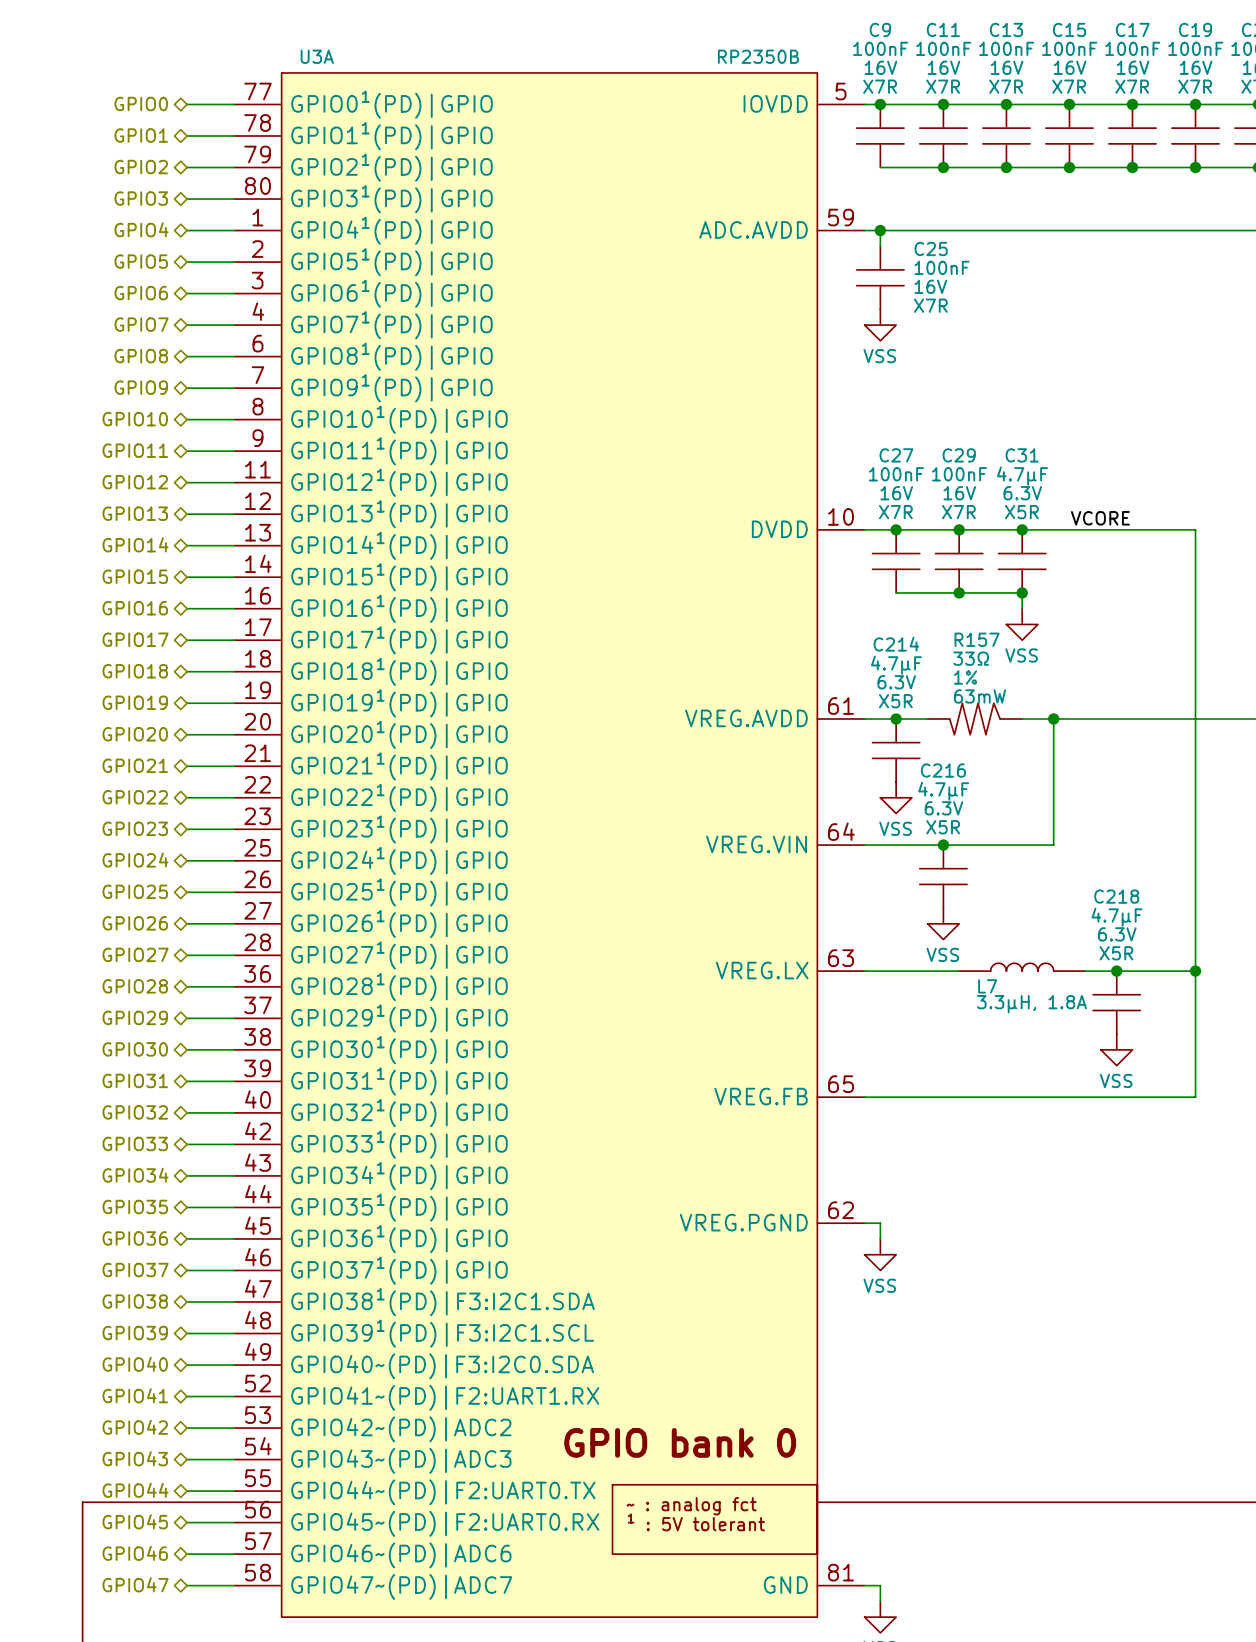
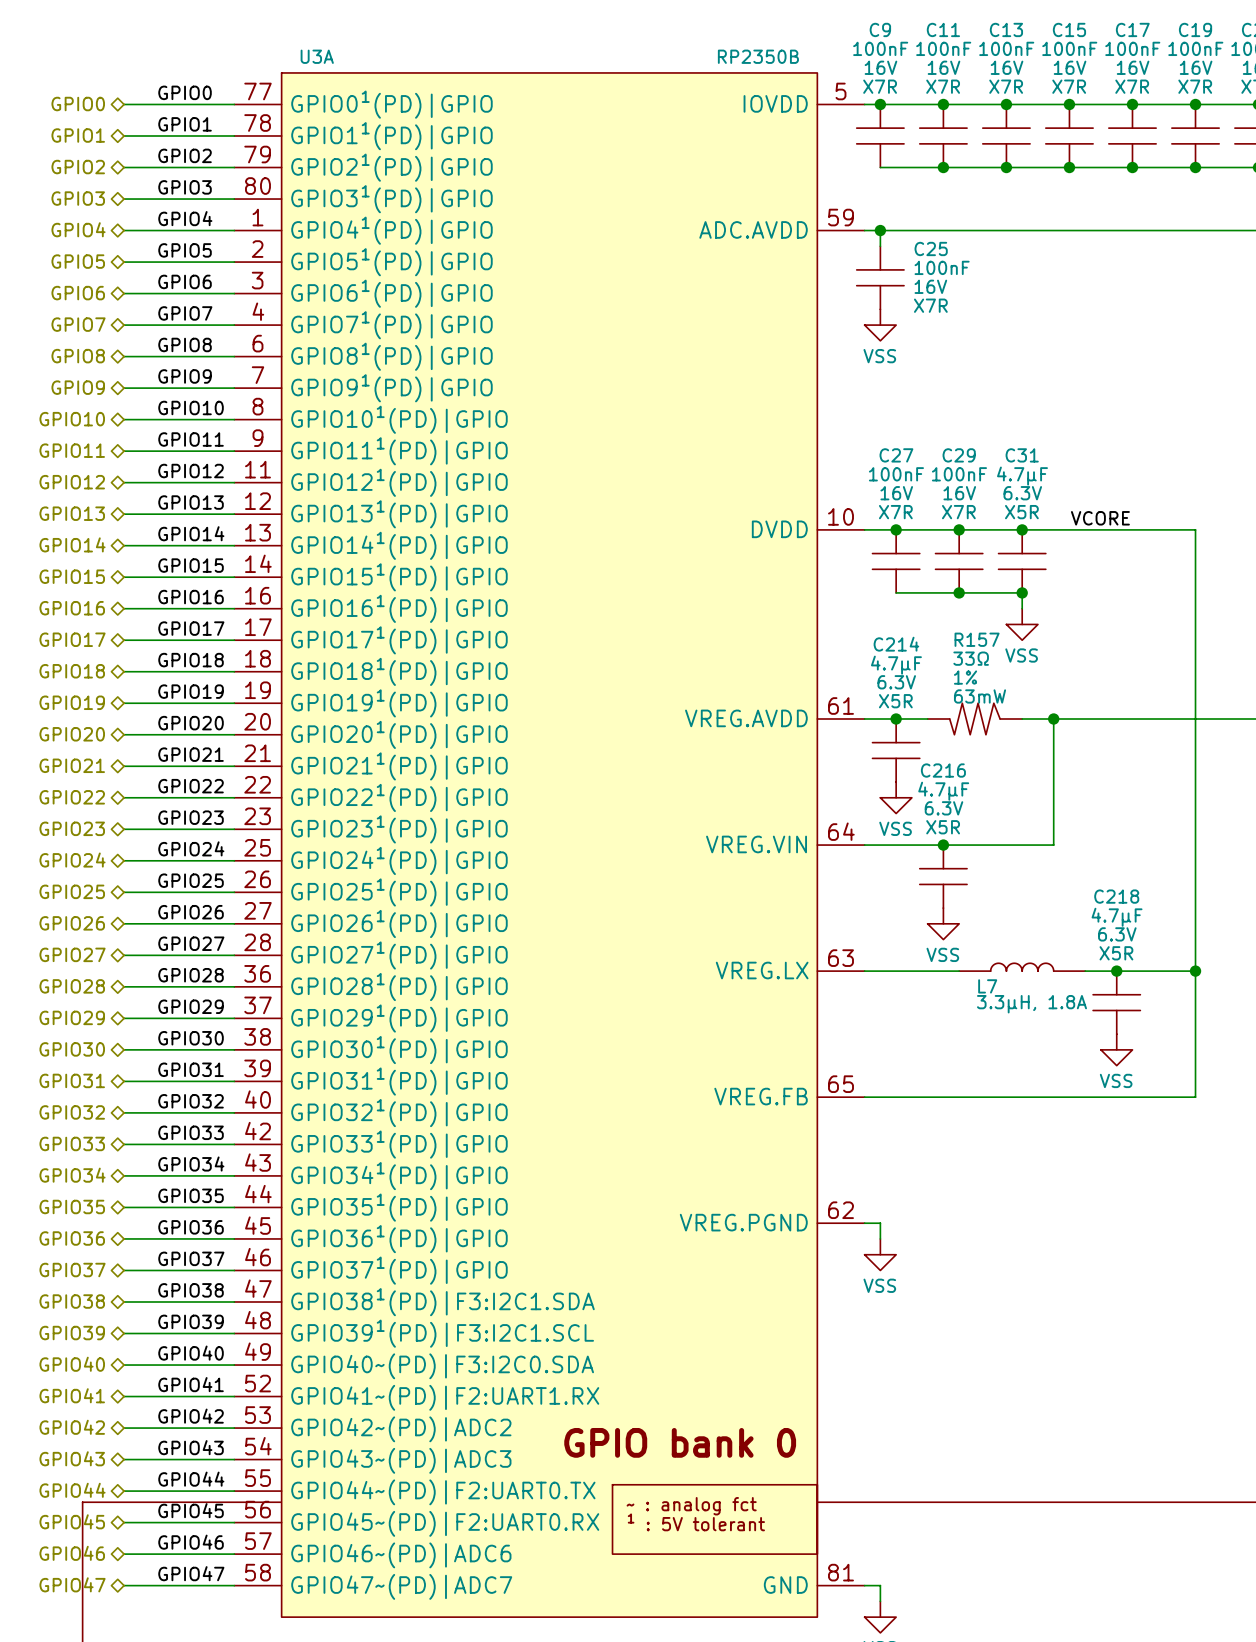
label: none -> GPIO0 (185, 92)
wire: none -> (124, 104) (187, 104)
hierarchical label position: GPIO0 (141, 104) -> GPIO0 (78, 104)
label: none -> GPIO1 (185, 124)
hierarchical label position: GPIO1 (141, 135) -> GPIO1 (78, 135)
wire: none -> (124, 136) (187, 136)
label: none -> GPIO2 (185, 155)
wire: none -> (124, 167) (187, 167)
hierarchical label position: GPIO2 (141, 167) -> GPIO2 (78, 167)
label: none -> GPIO3 (185, 187)
hierarchical label position: GPIO3 (141, 198) -> GPIO3 (78, 198)
wire: none -> (124, 199) (187, 199)
label: none -> GPIO4 (185, 218)
hierarchical label position: GPIO4 (141, 229) -> GPIO4 (78, 229)
wire: none -> (124, 230) (187, 230)
label: none -> GPIO5 (185, 250)
hierarchical label position: GPIO5 (141, 261) -> GPIO5 (78, 261)
wire: none -> (124, 262) (187, 262)
label: none -> GPIO6 (185, 281)
wire: none -> (124, 293) (187, 293)
hierarchical label position: GPIO6 (141, 293) -> GPIO6 (78, 293)
label: none -> GPIO7 (185, 313)
hierarchical label position: GPIO7 (141, 324) -> GPIO7 (78, 324)
wire: none -> (124, 325) (187, 325)
label: none -> GPIO8 (185, 344)
wire: none -> (124, 356) (187, 356)
hierarchical label position: GPIO8 (141, 356) -> GPIO8 (78, 356)
label: none -> GPIO9 (185, 376)
hierarchical label position: GPIO9 (141, 387) -> GPIO9 (78, 387)
wire: none -> (124, 388) (187, 388)
label: none -> GPIO10 (191, 407)
wire: none -> (124, 419) (187, 419)
hierarchical label position: GPIO10 (135, 419) -> GPIO10 (72, 419)
label: none -> GPIO11 (191, 439)
hierarchical label position: GPIO11 (135, 450) -> GPIO11 (72, 450)
wire: none -> (124, 451) (187, 451)
label: none -> GPIO12 (191, 471)
wire: none -> (124, 482) (187, 482)
hierarchical label position: GPIO12 (135, 482) -> GPIO12 (72, 482)
label: none -> GPIO13 (191, 502)
hierarchical label position: GPIO13 (135, 513) -> GPIO13 (72, 513)
wire: none -> (124, 514) (187, 514)
label: none -> GPIO14 (191, 533)
hierarchical label position: GPIO14 (135, 544) -> GPIO14 (72, 544)
wire: none -> (124, 545) (187, 545)
label: none -> GPIO15 (191, 565)
hierarchical label position: GPIO15 (135, 576) -> GPIO15 (72, 576)
wire: none -> (124, 577) (187, 577)
label: none -> GPIO16 (191, 597)
wire: none -> (124, 608) (187, 608)
hierarchical label position: GPIO16 (135, 608) -> GPIO16 (72, 608)
label: none -> GPIO17 (191, 628)
hierarchical label position: GPIO17 (135, 639) -> GPIO17 (72, 639)
wire: none -> (124, 640) (187, 640)
label: none -> GPIO18 (191, 660)
wire: none -> (124, 671) (187, 671)
hierarchical label position: GPIO18 (135, 671) -> GPIO18 (72, 671)
label: none -> GPIO19 (191, 691)
hierarchical label position: GPIO19 (135, 702) -> GPIO19 (72, 702)
wire: none -> (124, 703) (187, 703)
label: none -> GPIO20 (191, 723)
wire: none -> (124, 734) (187, 734)
hierarchical label position: GPIO20 (135, 734) -> GPIO20 (72, 734)
label: none -> GPIO21 (191, 754)
hierarchical label position: GPIO21 (135, 765) -> GPIO21 (72, 765)
wire: none -> (124, 766) (187, 766)
label: none -> GPIO22 (191, 786)
wire: none -> (124, 797) (187, 797)
hierarchical label position: GPIO22 (135, 797) -> GPIO22 (72, 797)
label: none -> GPIO23 (191, 817)
hierarchical label position: GPIO23 (135, 828) -> GPIO23 (72, 828)
wire: none -> (124, 829) (187, 829)
label: none -> GPIO24 (191, 848)
wire: none -> (124, 860) (187, 860)
hierarchical label position: GPIO24 (135, 860) -> GPIO24 (72, 860)
label: none -> GPIO25 (191, 880)
hierarchical label position: GPIO25 (135, 891) -> GPIO25 (72, 891)
wire: none -> (124, 892) (187, 892)
label: none -> GPIO26 (191, 912)
wire: none -> (124, 923) (187, 923)
hierarchical label position: GPIO26 (135, 923) -> GPIO26 (72, 923)
label: none -> GPIO27 (191, 943)
hierarchical label position: GPIO27 (135, 954) -> GPIO27 (72, 954)
wire: none -> (124, 955) (187, 955)
label: none -> GPIO28 (191, 975)
wire: none -> (124, 986) (187, 986)
hierarchical label position: GPIO28 (135, 986) -> GPIO28 (72, 986)
label: none -> GPIO29 (191, 1006)
hierarchical label position: GPIO29 (135, 1017) -> GPIO29 (72, 1017)
wire: none -> (124, 1018) (187, 1018)
label: none -> GPIO30 (191, 1038)
wire: none -> (124, 1049) (187, 1049)
hierarchical label position: GPIO30 (135, 1049) -> GPIO30 (72, 1049)
label: none -> GPIO31 (191, 1069)
hierarchical label position: GPIO31 (135, 1080) -> GPIO31 (72, 1080)
wire: none -> (124, 1081) (187, 1081)
label: none -> GPIO32 (191, 1101)
wire: none -> (124, 1112) (187, 1112)
hierarchical label position: GPIO32 (135, 1112) -> GPIO32 (72, 1112)
label: none -> GPIO33 (191, 1132)
hierarchical label position: GPIO33 (135, 1143) -> GPIO33 (72, 1143)
wire: none -> (124, 1144) (187, 1144)
label: none -> GPIO34 (191, 1164)
wire: none -> (124, 1175) (187, 1175)
hierarchical label position: GPIO34 (135, 1175) -> GPIO34 (72, 1175)
label: none -> GPIO35 (191, 1195)
hierarchical label position: GPIO35 (135, 1206) -> GPIO35 (72, 1206)
wire: none -> (124, 1207) (187, 1207)
label: none -> GPIO36 (191, 1227)
wire: none -> (124, 1238) (187, 1238)
hierarchical label position: GPIO36 (135, 1238) -> GPIO36 (72, 1238)
label: none -> GPIO37 (191, 1258)
wire: none -> (124, 1270) (187, 1270)
hierarchical label position: GPIO37 (135, 1270) -> GPIO37 (72, 1270)
label: none -> GPIO38 (191, 1290)
wire: none -> (124, 1301) (187, 1301)
hierarchical label position: GPIO38 (135, 1301) -> GPIO38 (72, 1301)
label: none -> GPIO39 (191, 1321)
wire: none -> (124, 1333) (187, 1333)
hierarchical label position: GPIO39 (135, 1333) -> GPIO39 (72, 1333)
label: none -> GPIO40 (191, 1353)
hierarchical label position: GPIO40 (135, 1364) -> GPIO40 (72, 1364)
wire: none -> (124, 1365) (187, 1365)
label: none -> GPIO41 (191, 1384)
hierarchical label position: GPIO41 (135, 1395) -> GPIO41 (72, 1395)
wire: none -> (124, 1396) (187, 1396)
label: none -> GPIO42 (191, 1416)
hierarchical label position: GPIO42 (135, 1427) -> GPIO42 (72, 1427)
wire: none -> (124, 1428) (187, 1428)
label: none -> GPIO43 (191, 1447)
hierarchical label position: GPIO43 (135, 1458) -> GPIO43 (72, 1458)
wire: none -> (124, 1459) (187, 1459)
label: none -> GPIO44 (191, 1479)
hierarchical label position: GPIO44 (135, 1490) -> GPIO44 (72, 1490)
wire: none -> (124, 1491) (187, 1491)
label: none -> GPIO45 (191, 1510)
hierarchical label position: GPIO45 (135, 1521) -> GPIO45 (72, 1521)
wire: none -> (124, 1522) (187, 1522)
label: none -> GPIO46 (191, 1542)
hierarchical label position: GPIO46 (135, 1553) -> GPIO46 (72, 1553)
wire: none -> (124, 1554) (187, 1554)
label: none -> GPIO47 (191, 1573)
hierarchical label position: GPIO47 (135, 1584) -> GPIO47 (72, 1584)
wire: none -> (124, 1585) (187, 1585)

